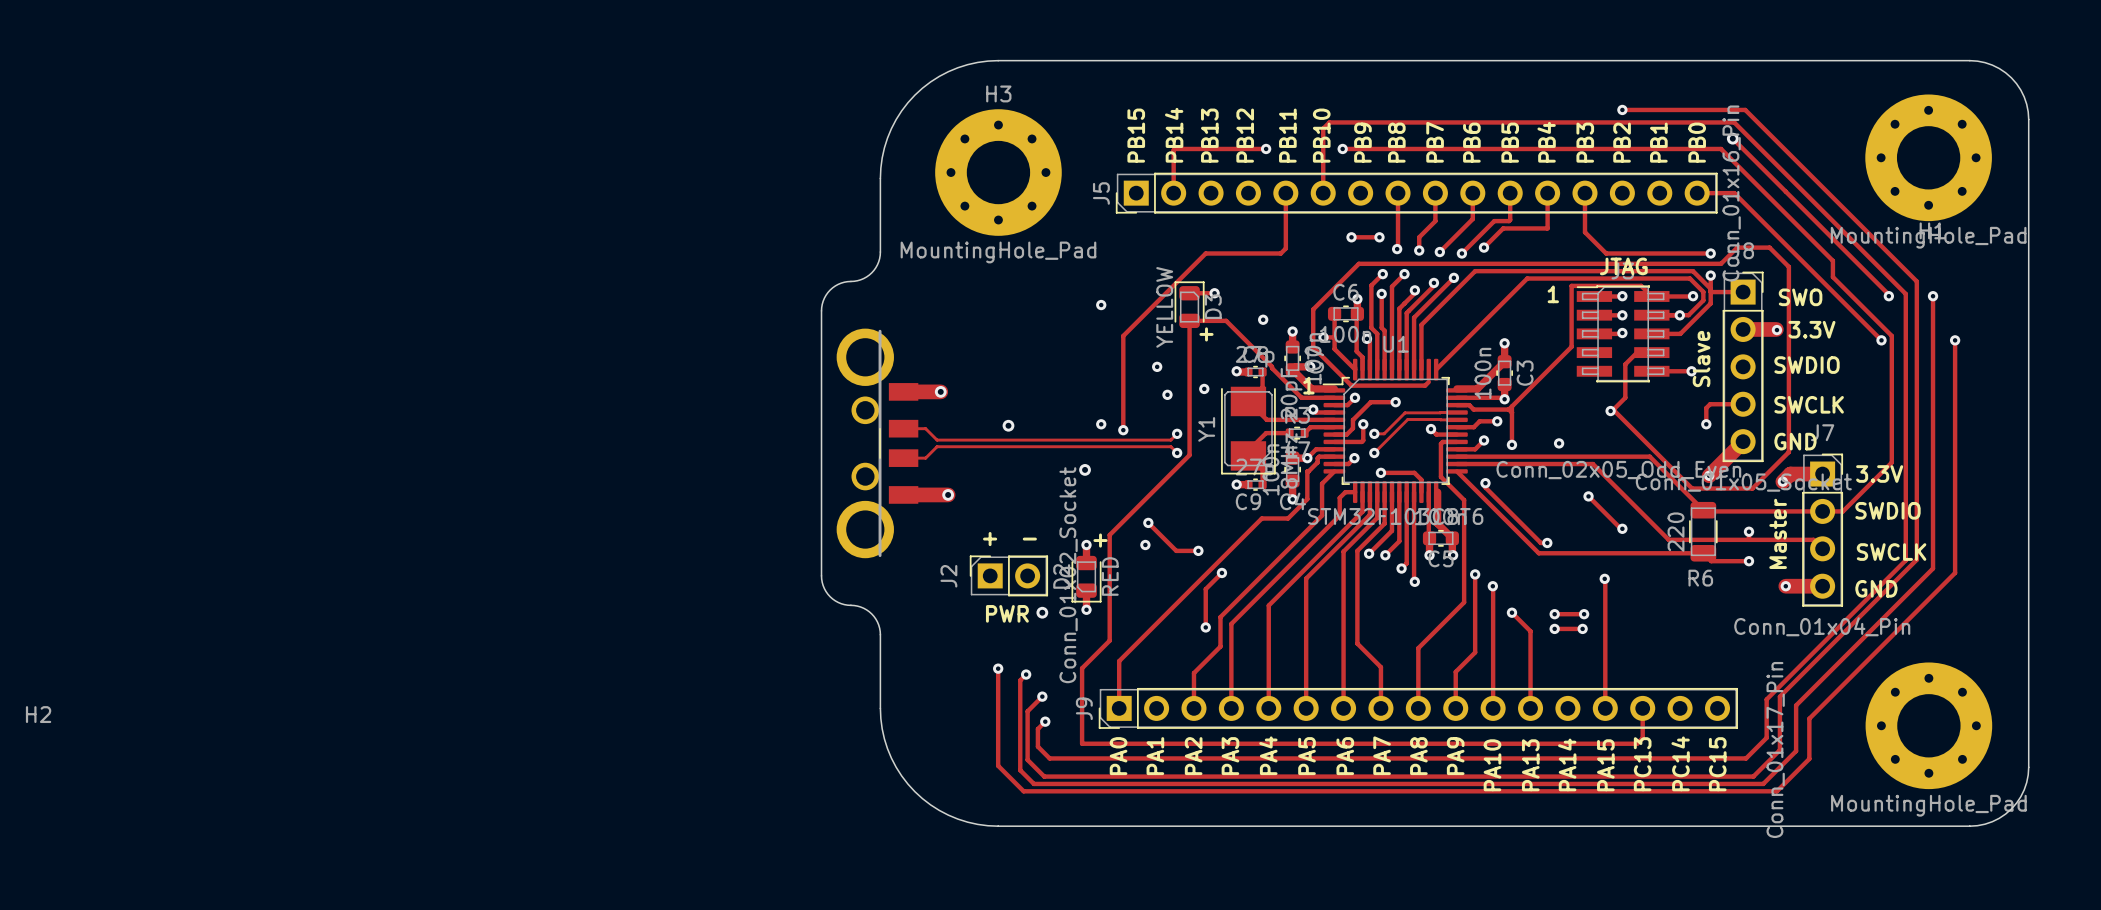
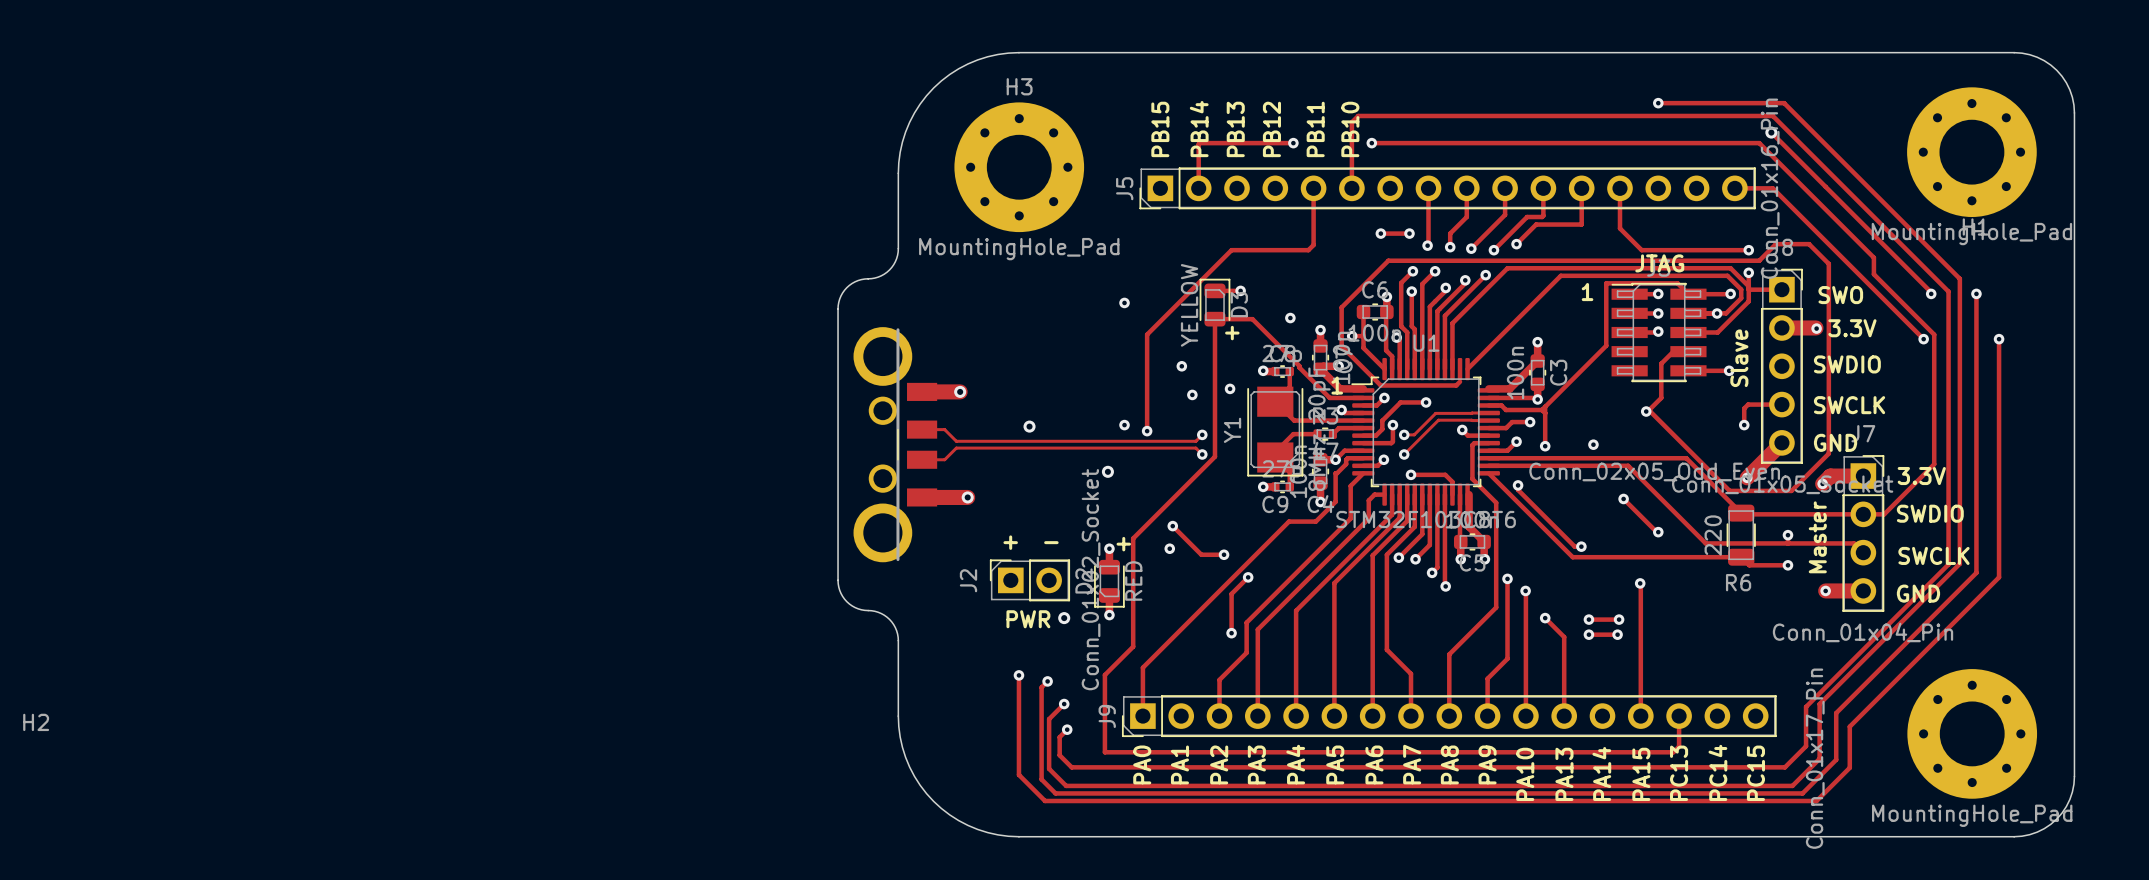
text: PB9 (1362, 142) -> none
text: PB8 (1396, 142) -> none
text: PB7 (1435, 142) -> none
text: PB6 (1471, 142) -> none
text: PB5 (1510, 142) -> none
text: PB4 (1546, 142) -> none
text: PB3 (1585, 142) -> none
text: PB2 (1622, 142) -> none
text: PB1 (1658, 142) -> none
text: PB0 (1697, 142) -> none

